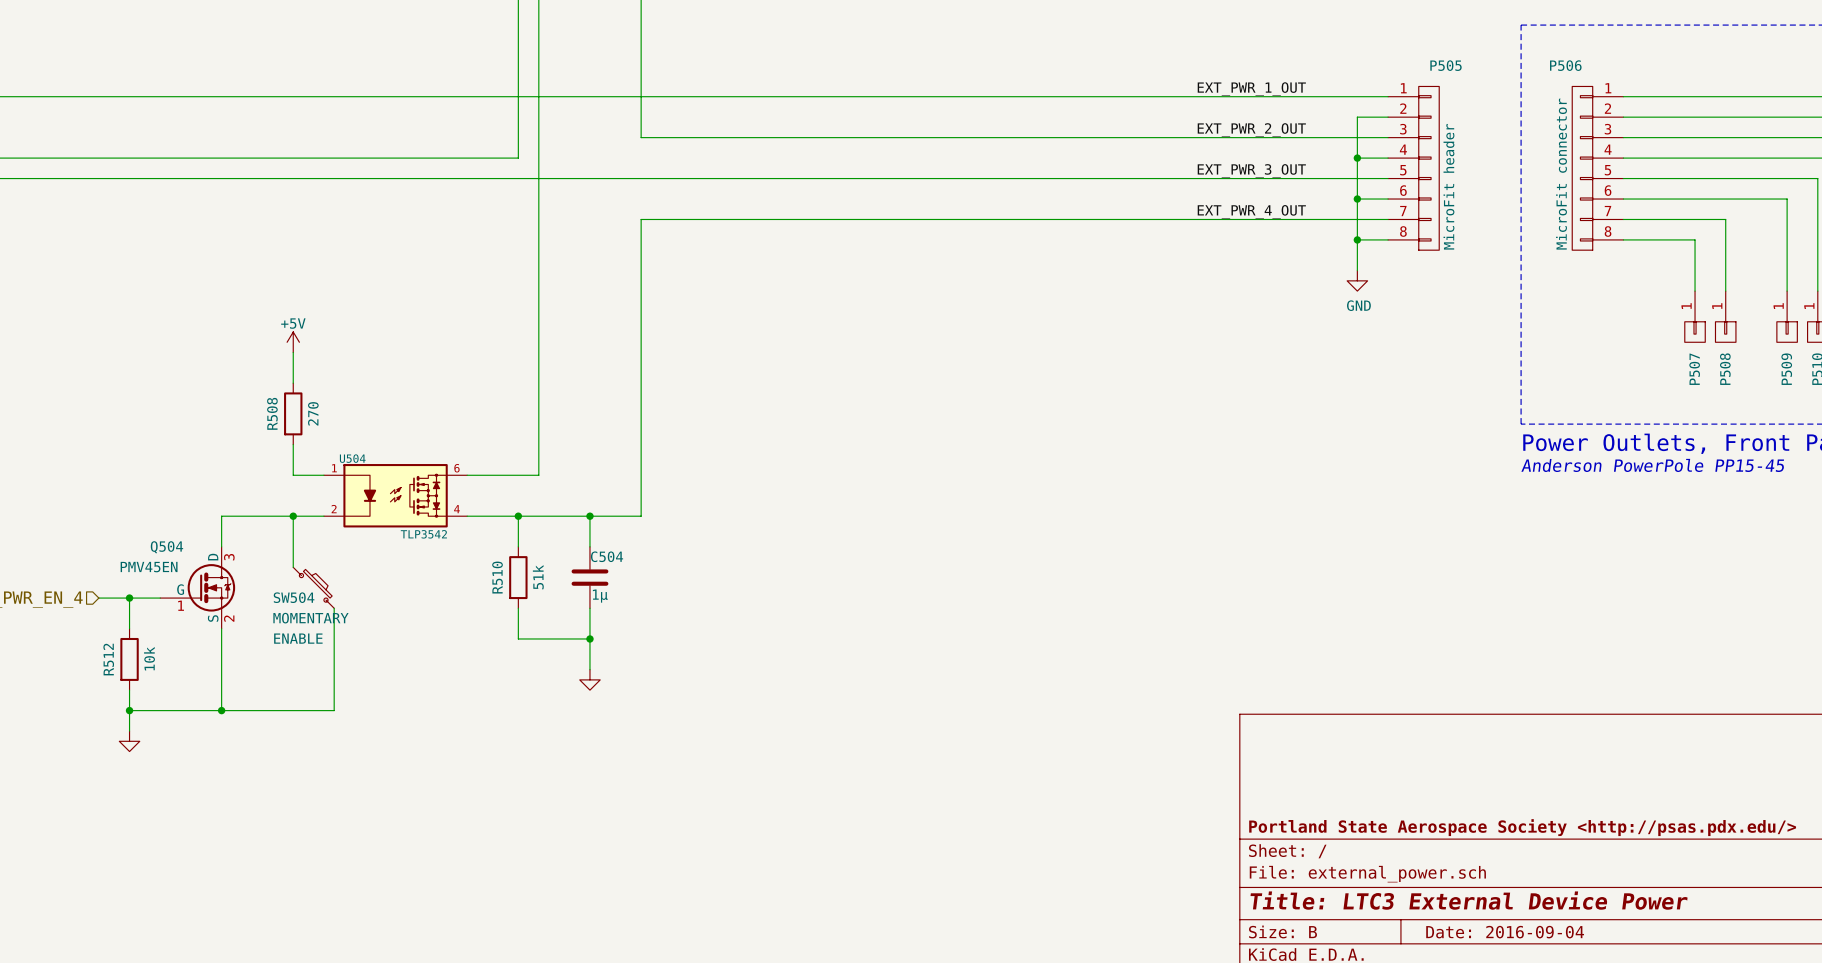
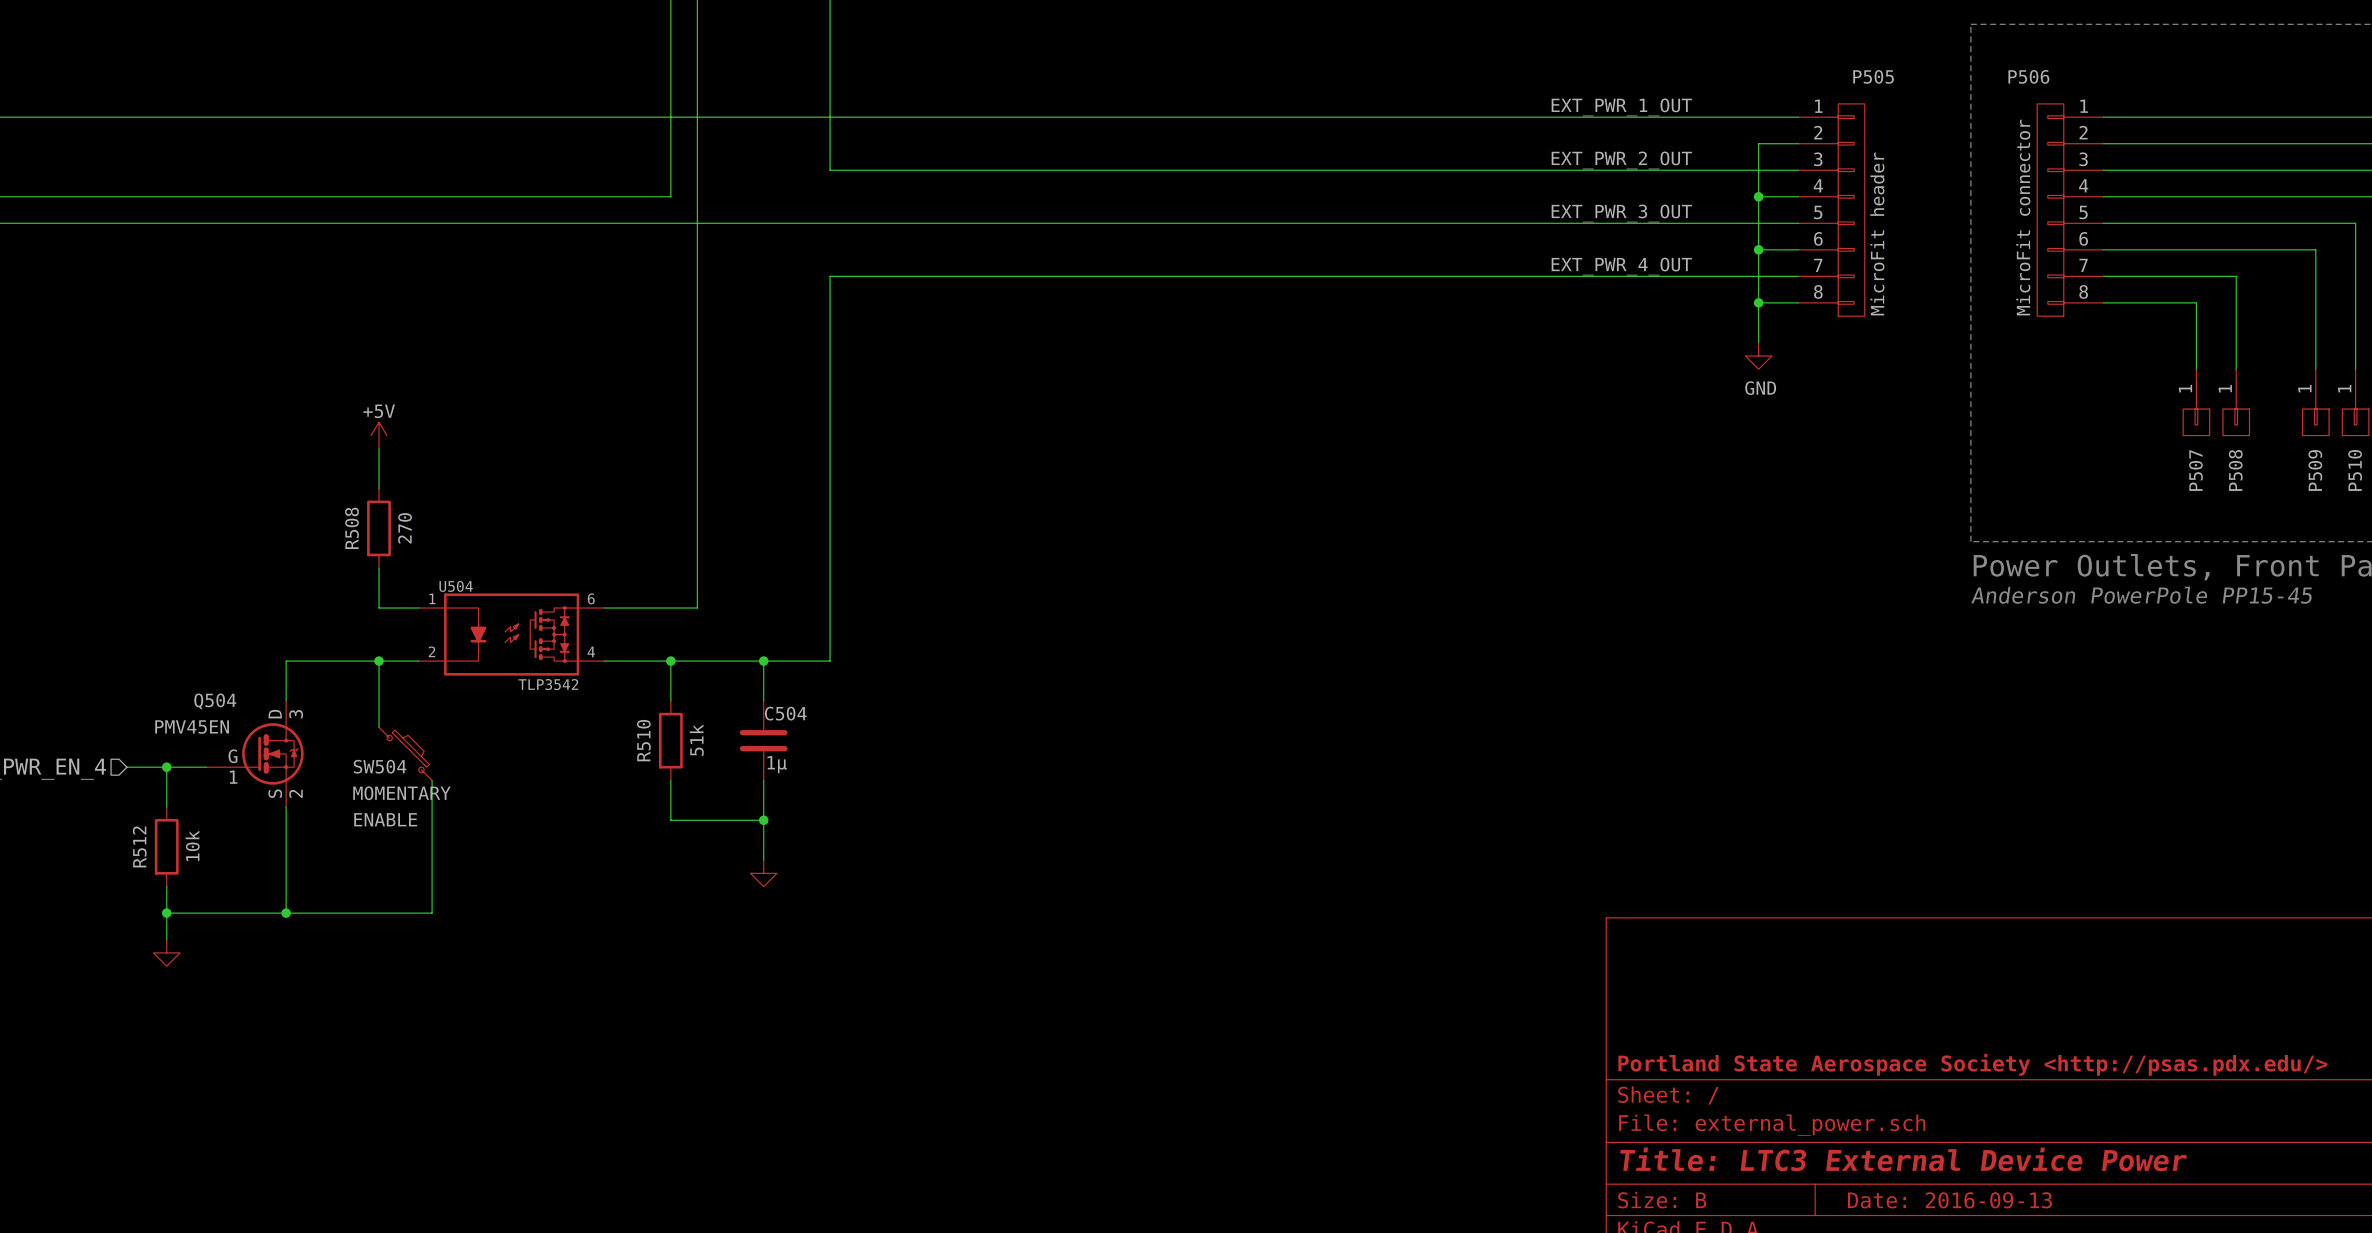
title block: Date: 2016-09-04 (1505, 932) -> Date: 2016-09-13 (1949, 1200)

